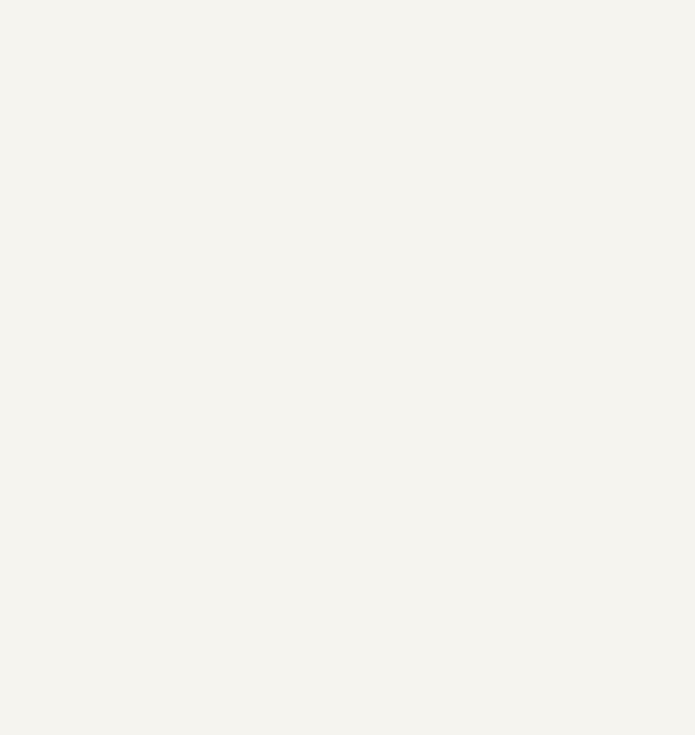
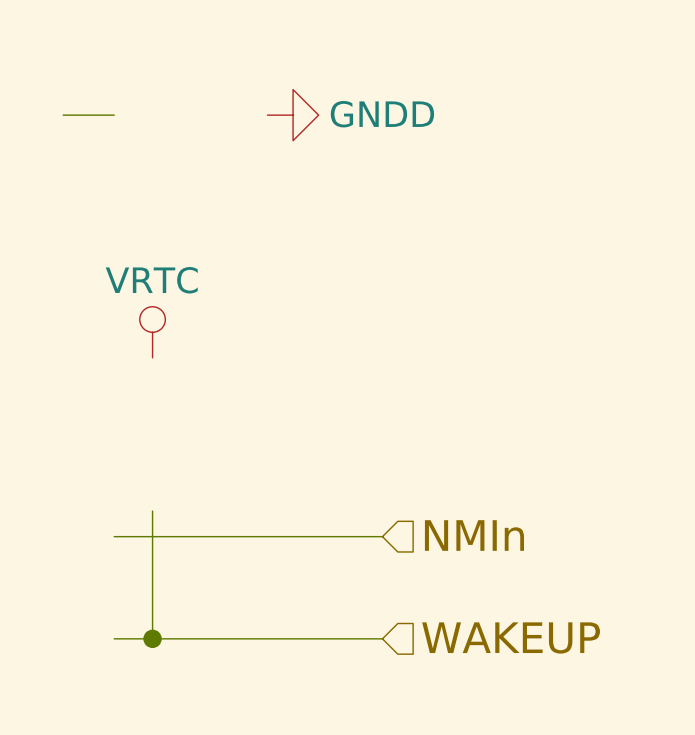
wire: none -> (63, 115) (114, 115)
power symbol: none -> GNDD (293, 115)
power symbol: none -> VRTC (152, 332)
wire: none -> (152, 511) (152, 638)
hierarchical label: none -> NMIn (474, 535)
wire: none -> (114, 536) (382, 536)
hierarchical label: none -> WAKEUP (511, 637)
wire: none -> (114, 638) (382, 638)
junction: none -> (152, 638)

